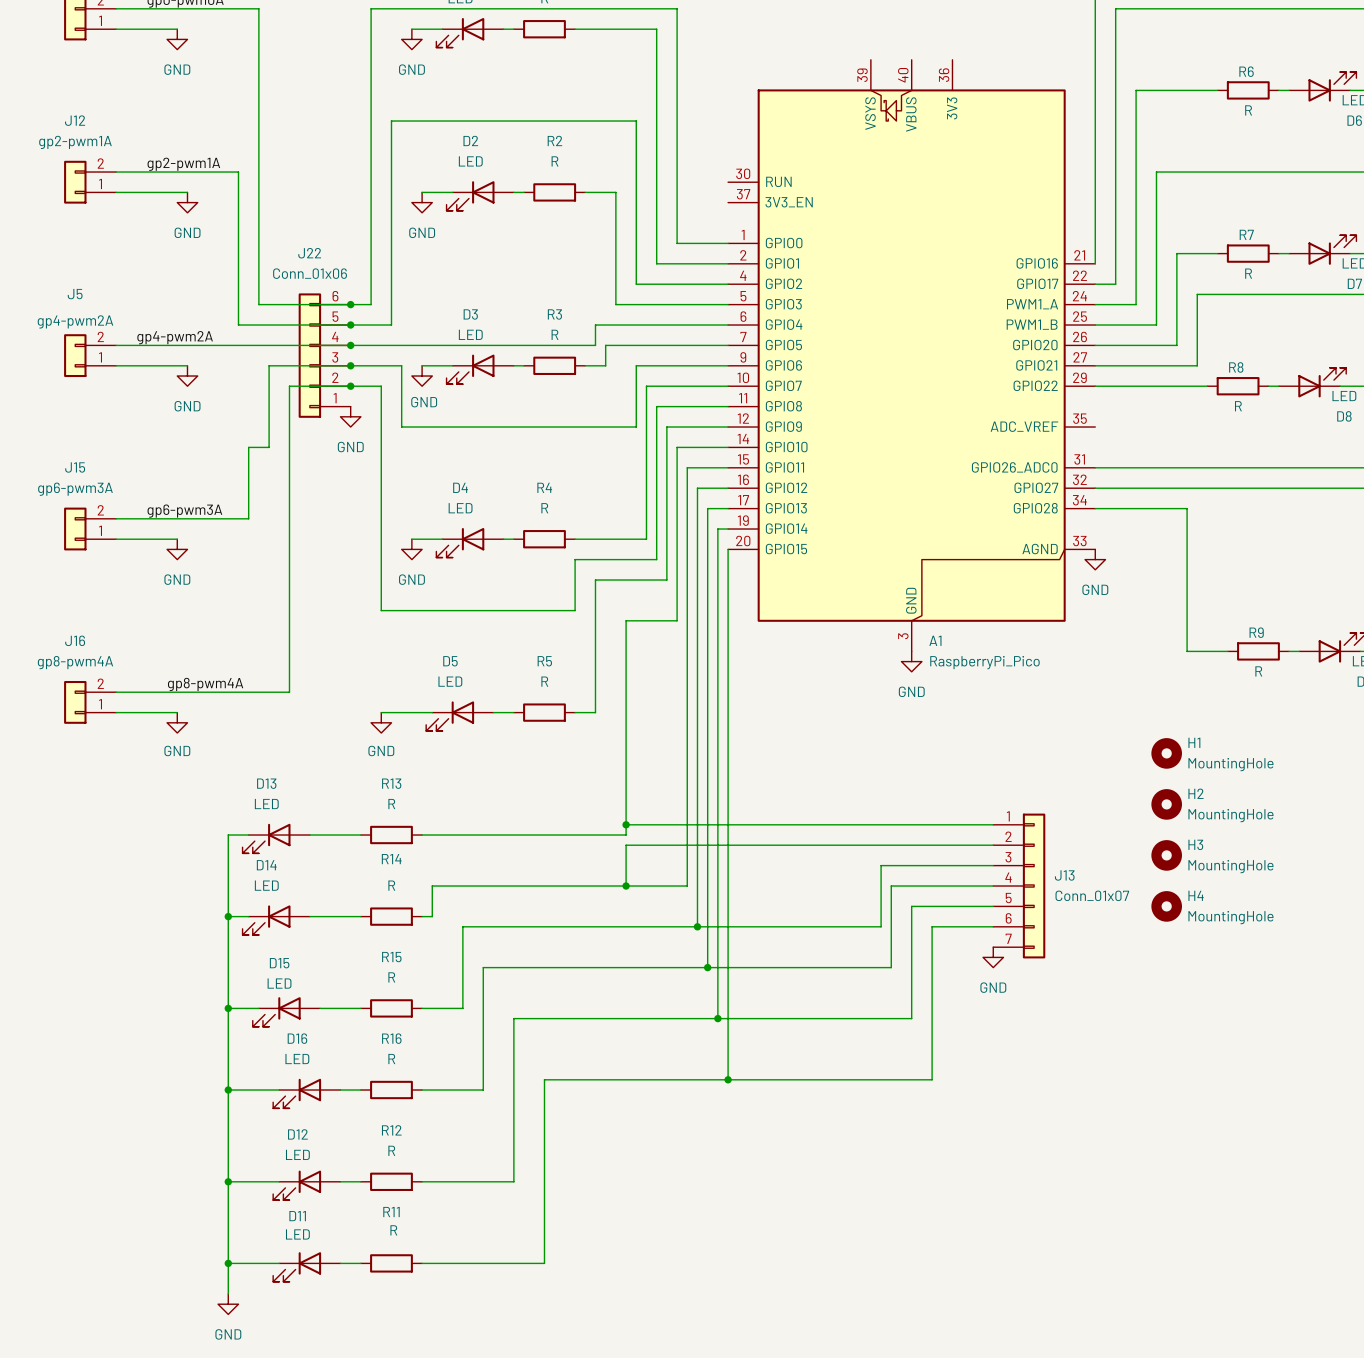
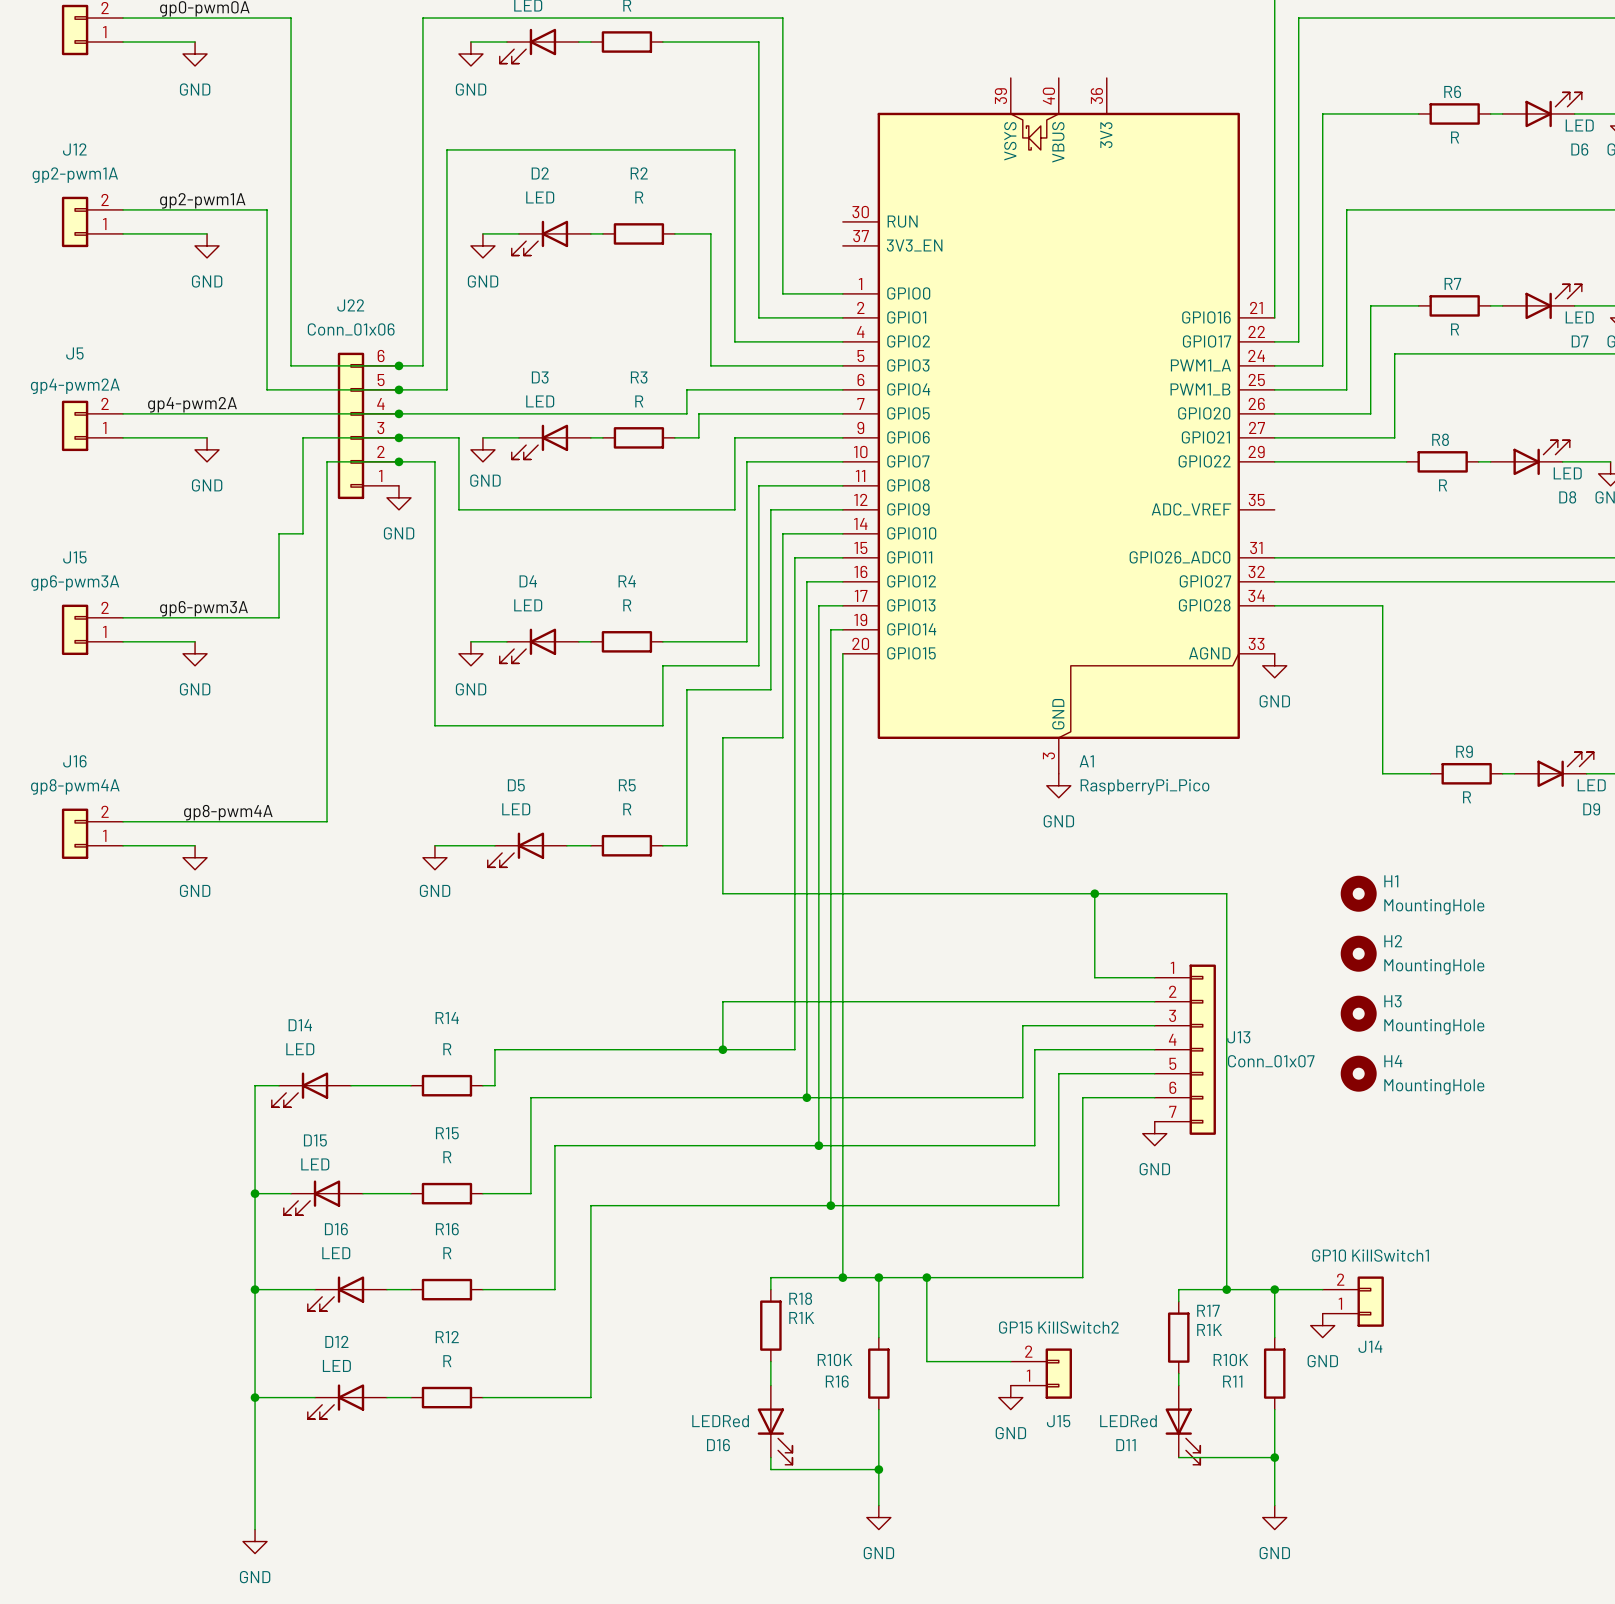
wire: (626, 753) (626, 835) (422, 835) -> (722, 893) (1226, 893) (1226, 1289)
junction: none -> (1094, 893)
wire: (626, 824) (942, 824) -> (1094, 893) (1094, 977)
junction: (626, 824) -> none
wire: (248, 835) (228, 835) (228, 916) -> none
wire: (309, 835) (360, 835) -> none
R13: R (391, 835) -> none
D13: LED (276, 838) -> none
junction: (228, 916) -> none
wire: (666, 1079) (544, 1079) (544, 1263) (422, 1263) -> (770, 1277) (770, 1289)
wire: none -> (878, 1277) (878, 1337)
junction: none -> (878, 1277)
wire: none -> (926, 1277) (926, 1361) (1010, 1361)
junction: none -> (926, 1277)
junction: none -> (1226, 1289)
wire: none -> (1274, 1289) (1274, 1337)
junction: none -> (1274, 1289)
wire: none -> (1322, 1289) (1178, 1289) (1178, 1301)
J14: none -> GP10 KillSwitch1 (1353, 1301)
R18: none -> R1K (770, 1325)
power symbol: none -> GND (1322, 1325)
R17: none -> R1K (1178, 1337)
wire: none -> (770, 1361) (770, 1385)
R16: none -> R10K (878, 1373)
J15: none -> GP15 KillSwitch2 (1041, 1373)
wire: none -> (1178, 1373) (1178, 1385)
power symbol: none -> GND (1010, 1397)
wire: none -> (878, 1409) (878, 1505)
wire: none -> (1274, 1409) (1274, 1505)
D16: none -> LEDRed (775, 1425)
R11 name position: R11 (391, 1212) -> R11 (1232, 1381)
R11 value: R (393, 1230) -> R10K (1230, 1359)
wire: none -> (770, 1457) (770, 1469) (878, 1469)
wire: none -> (1178, 1457) (1274, 1457)
junction: none -> (1274, 1457)
D11 value: LED (297, 1234) -> LEDRed (1128, 1421)
junction: none -> (878, 1469)
wire: (228, 1263) (279, 1263) -> none
junction: (228, 1263) -> none
wire: (340, 1263) (360, 1263) -> none
R11 rotation: 0° (391, 1263) -> 90° clockwise (1274, 1373)
R11 position: (391, 1263) -> (1274, 1373)
D11 rotation: 0° (297, 1266) -> 90° counterclockwise (1182, 1436)
D11 position: (306, 1266) -> (1182, 1425)
power symbol: none -> GND (878, 1517)
power symbol: none -> GND (1274, 1517)

